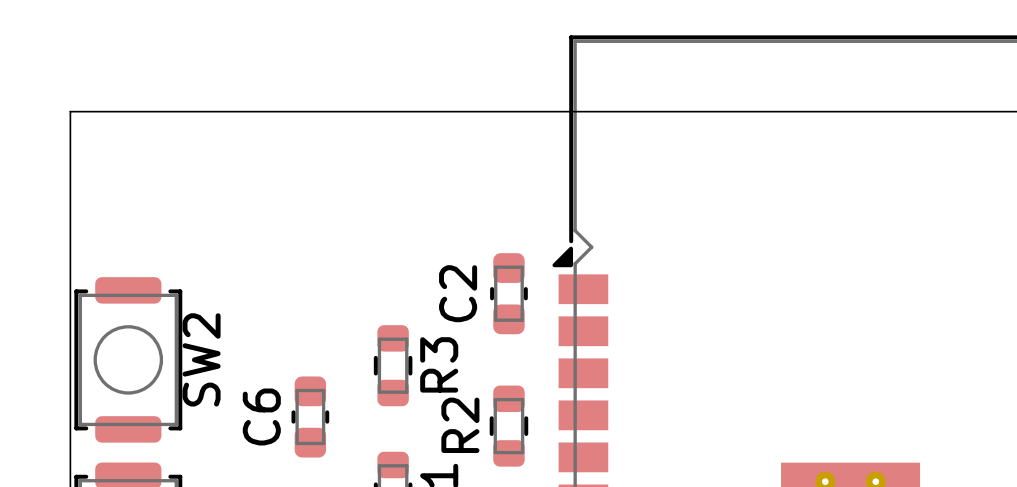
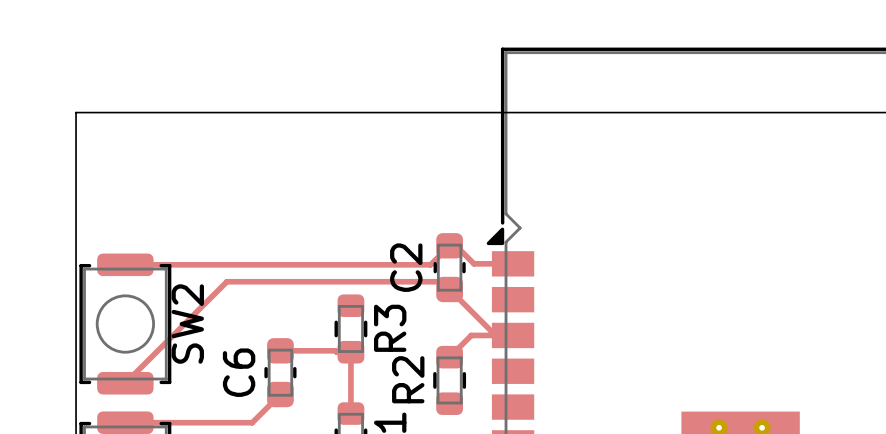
top track: none -> (513, 263) (474, 263) (455, 245) (449, 245) (430, 264) (125, 264)
top track: none -> (495, 335) (441, 281) (226, 281) (125, 383)
top track: none -> (513, 335) (471, 335) (449, 357)
top track: none -> (280, 350) (350, 352) (350, 413)
top track: none -> (280, 394) (252, 422) (125, 422)

